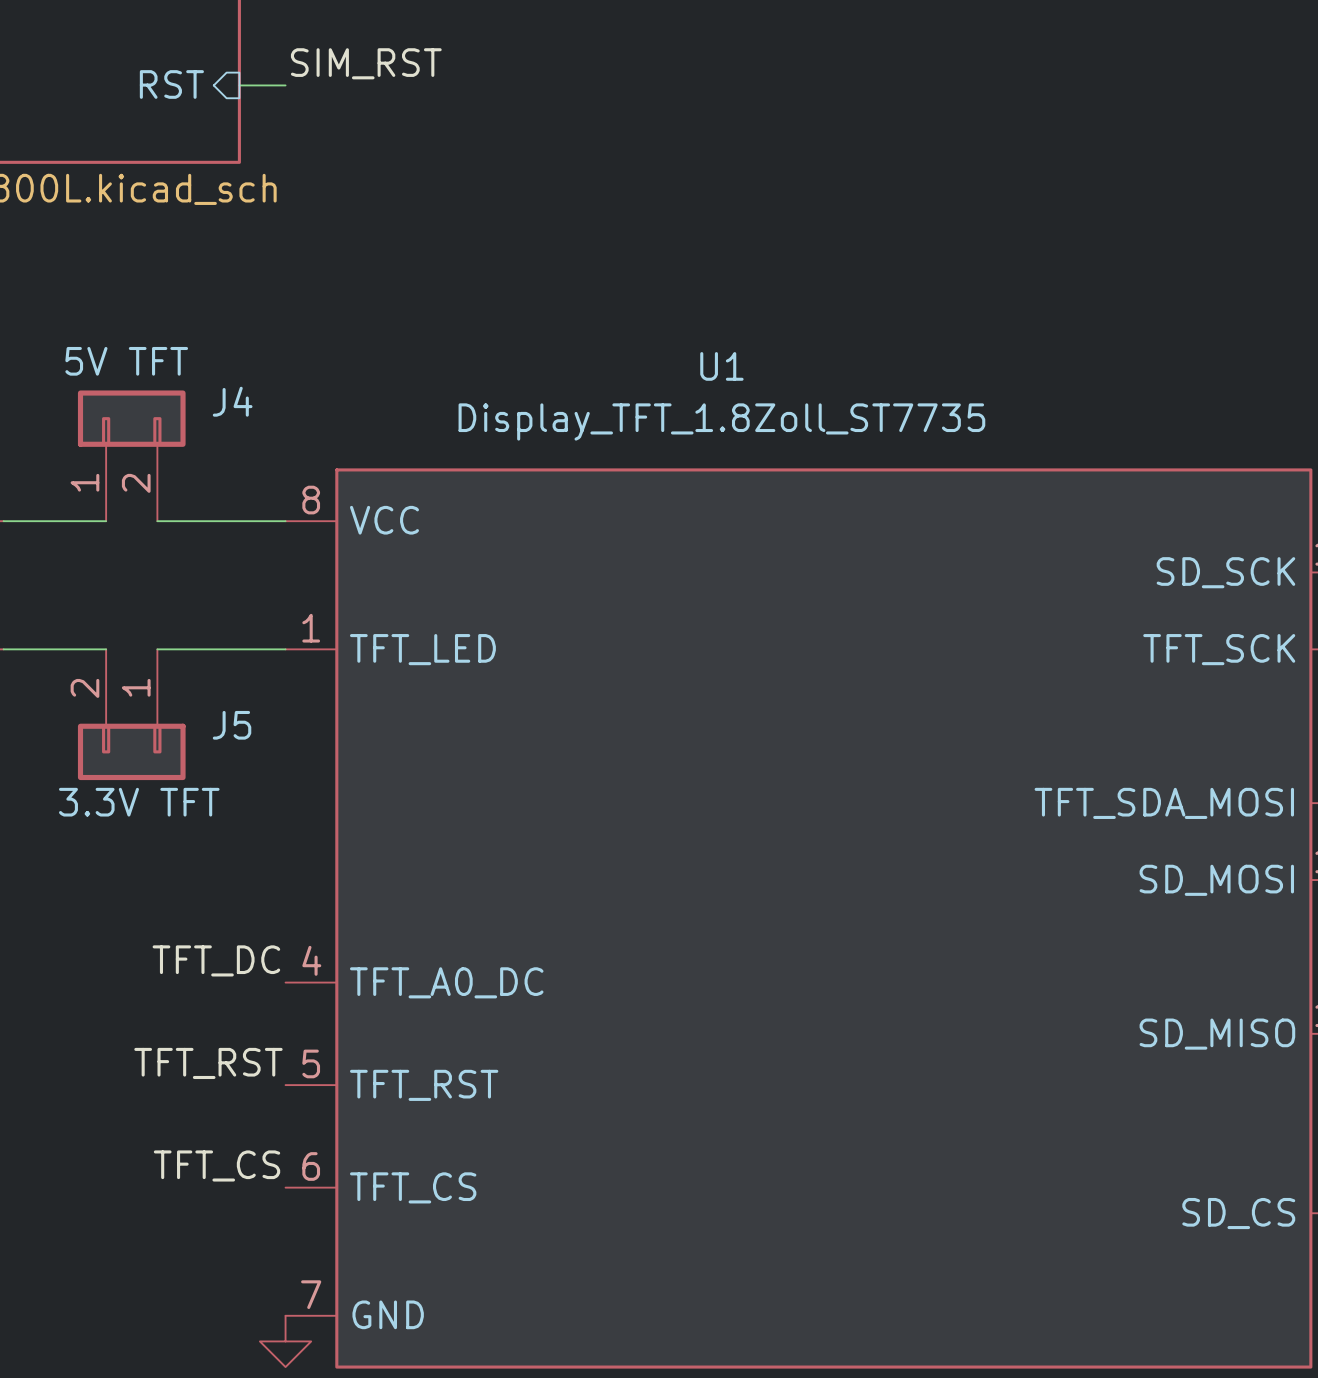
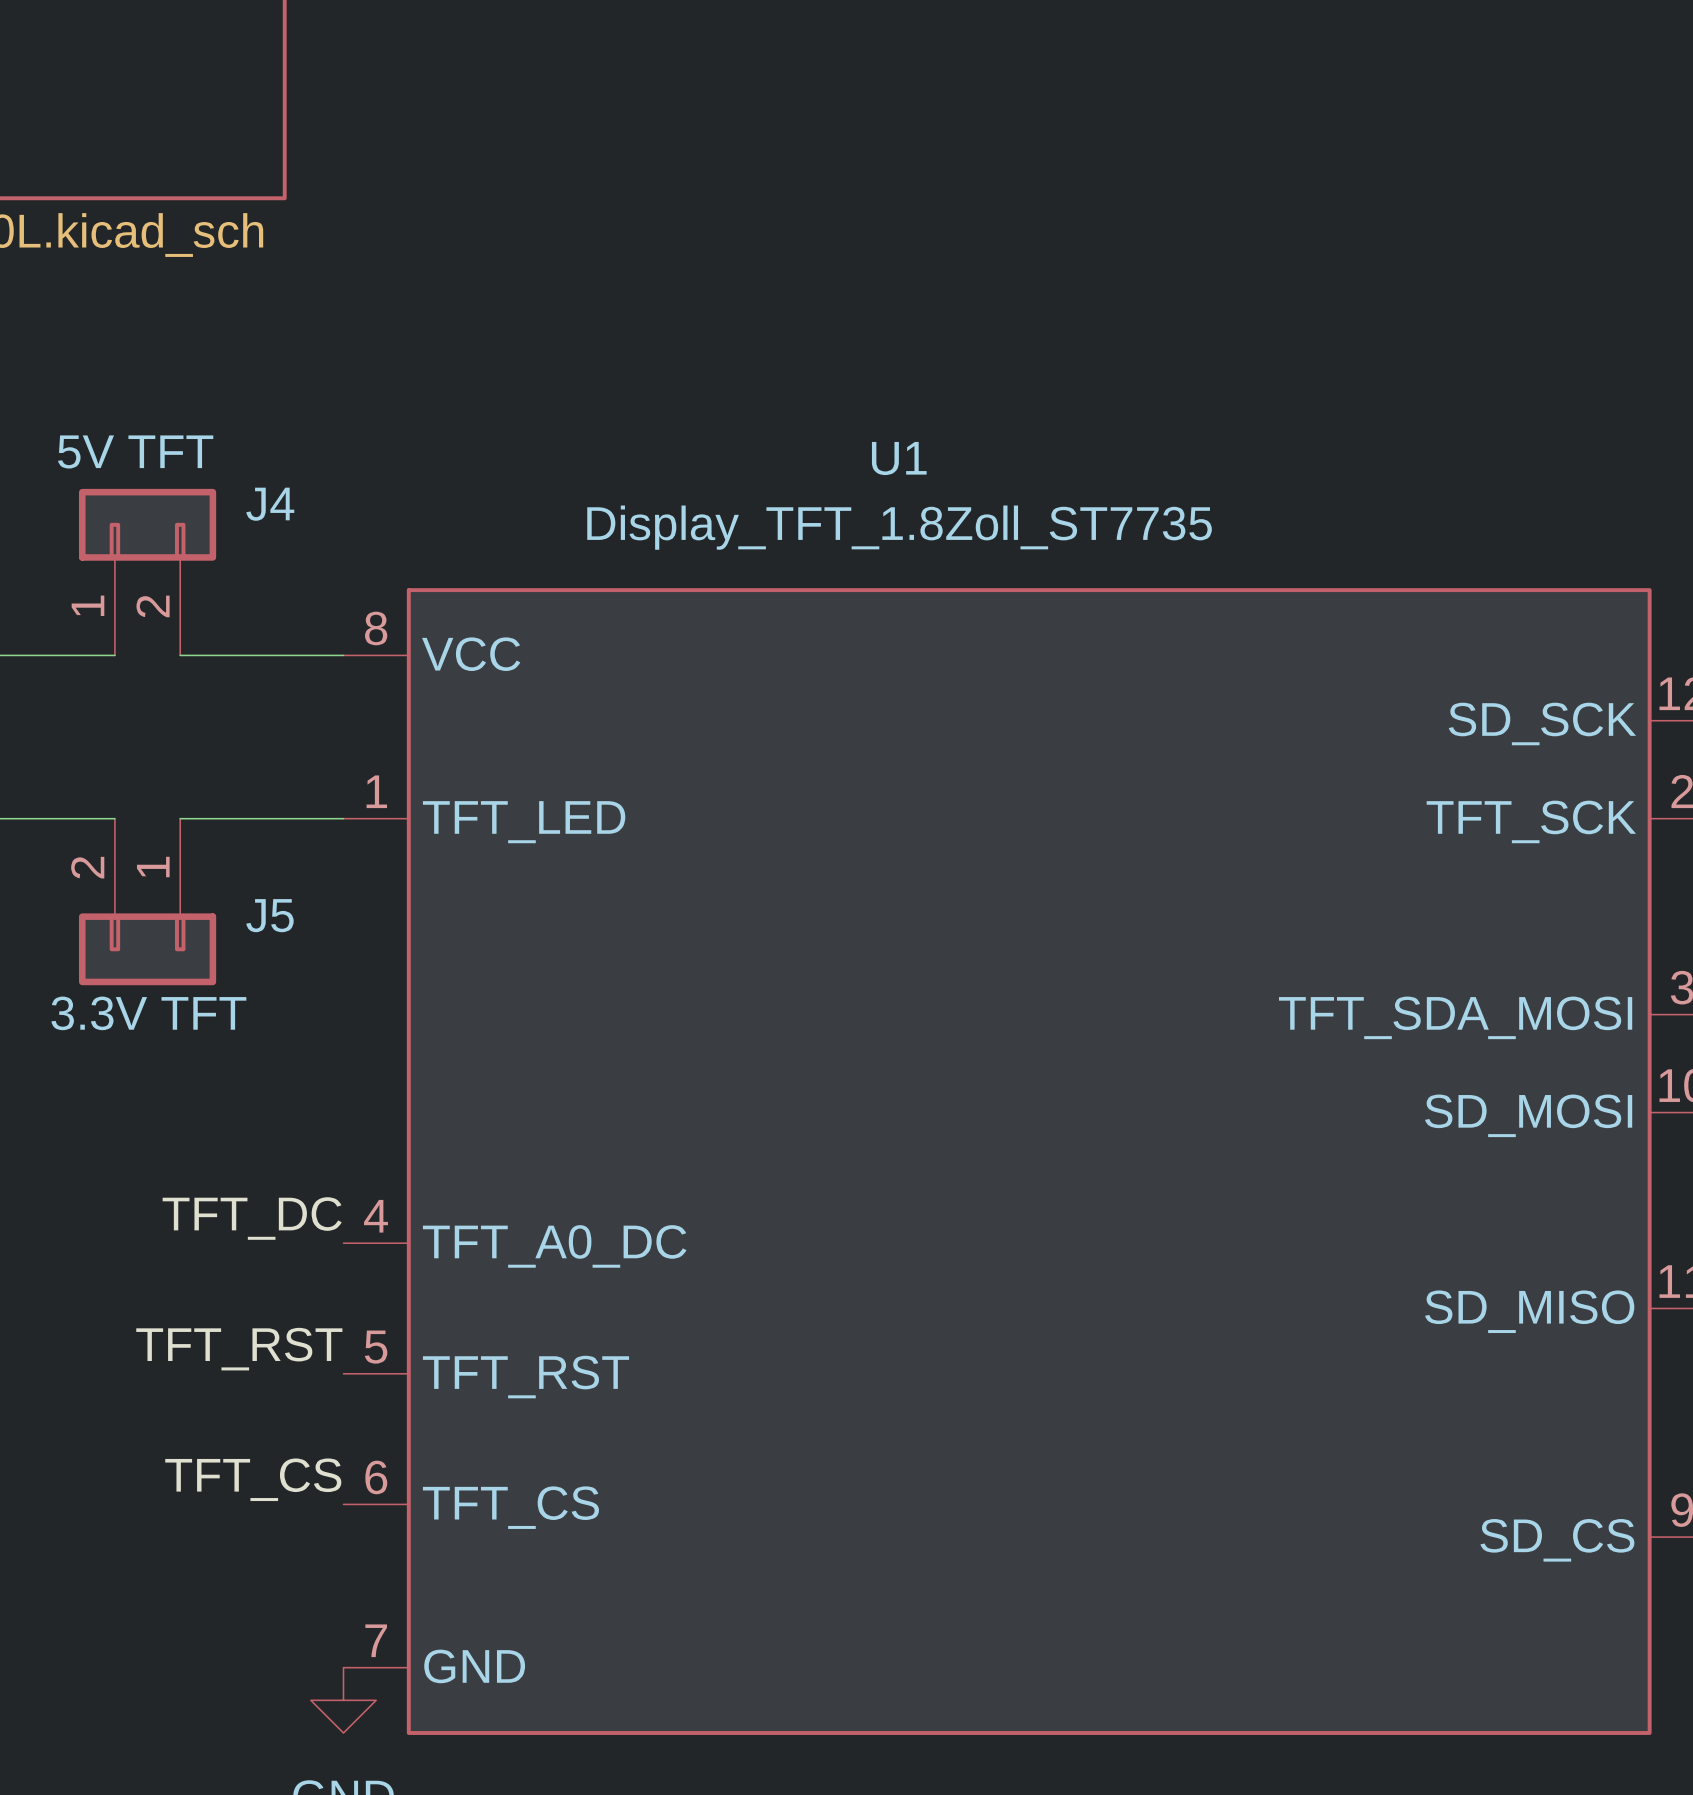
label: SIM_RST (366, 63) -> none
sheet pin: RST (171, 84) -> none
wire: (239, 85) (285, 85) -> none

